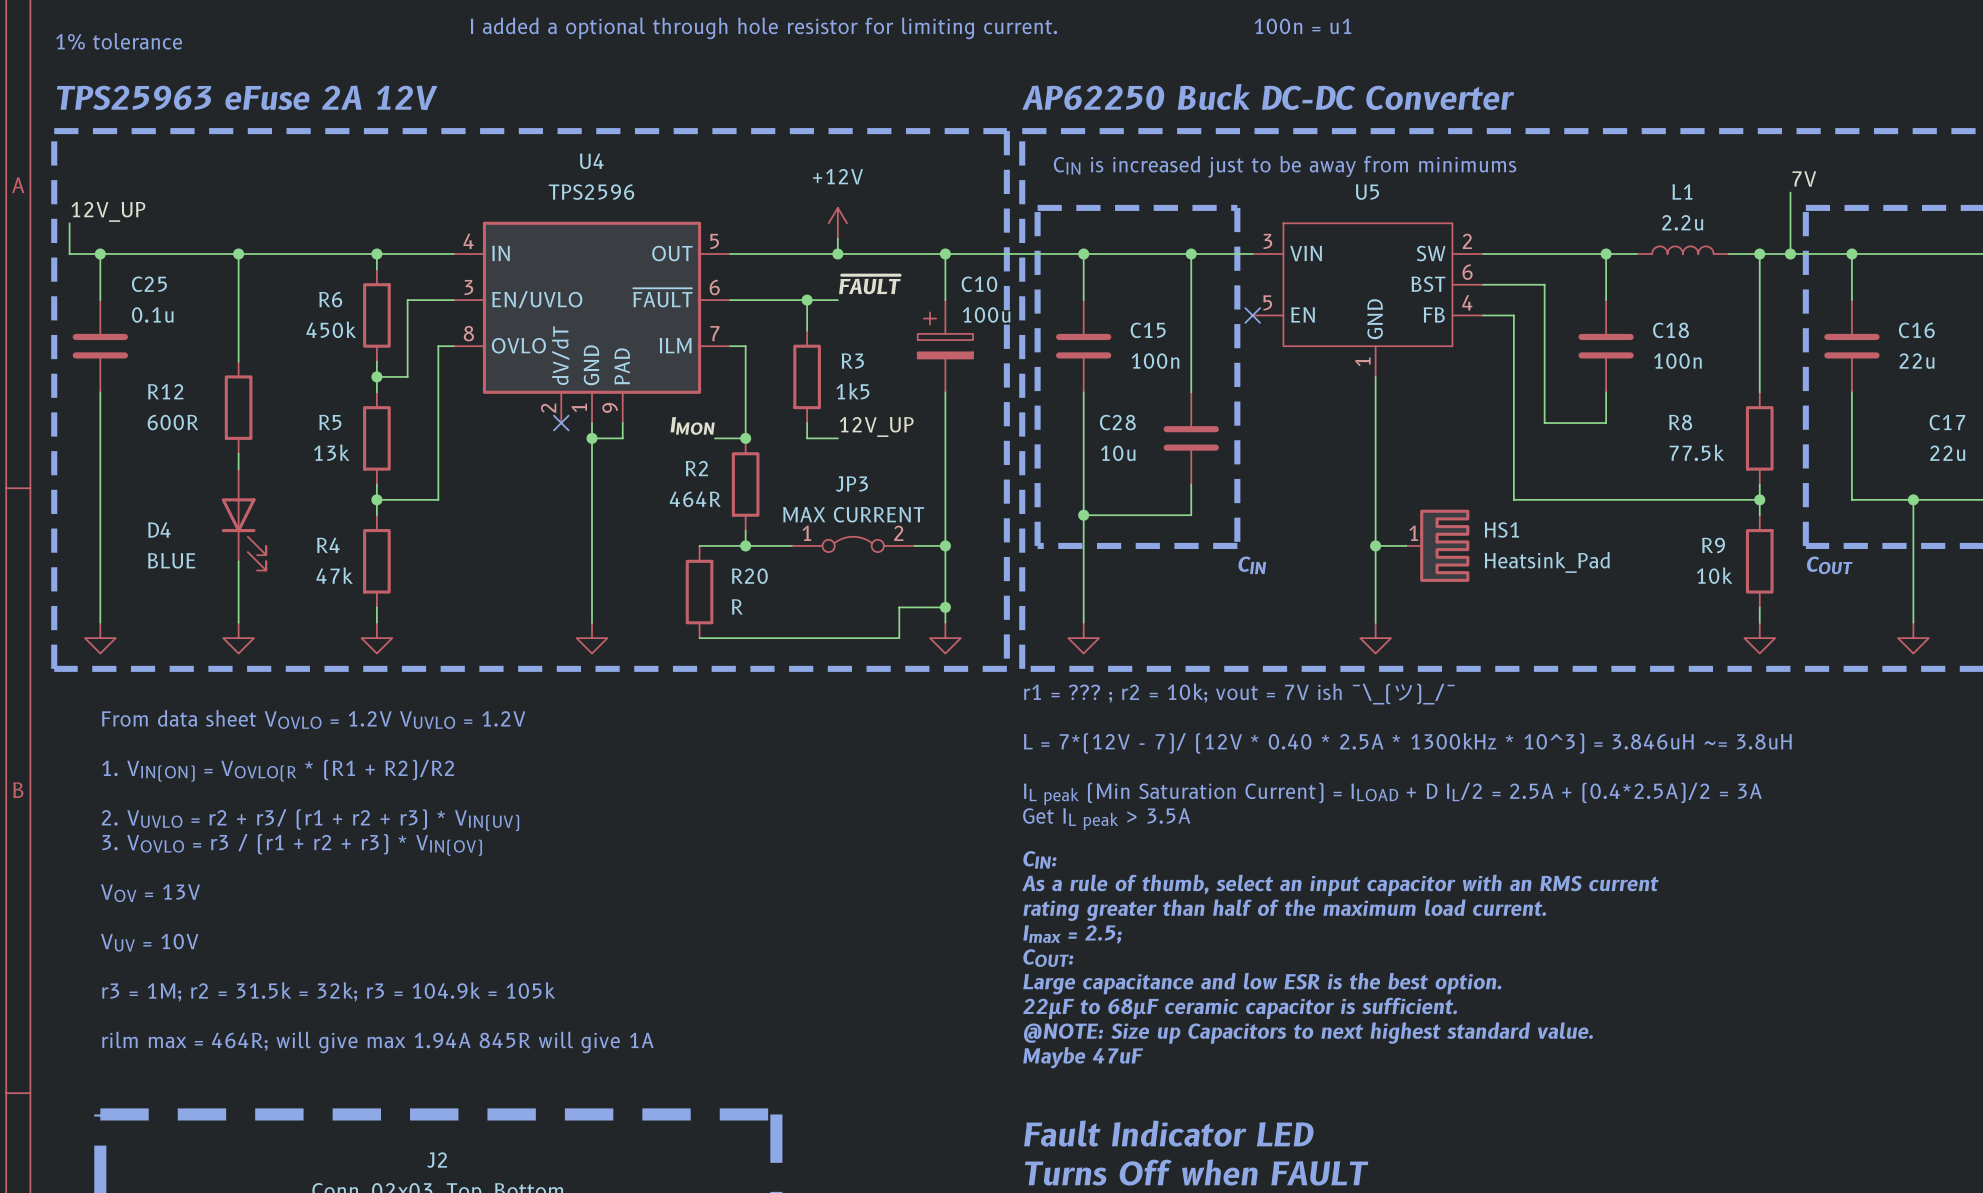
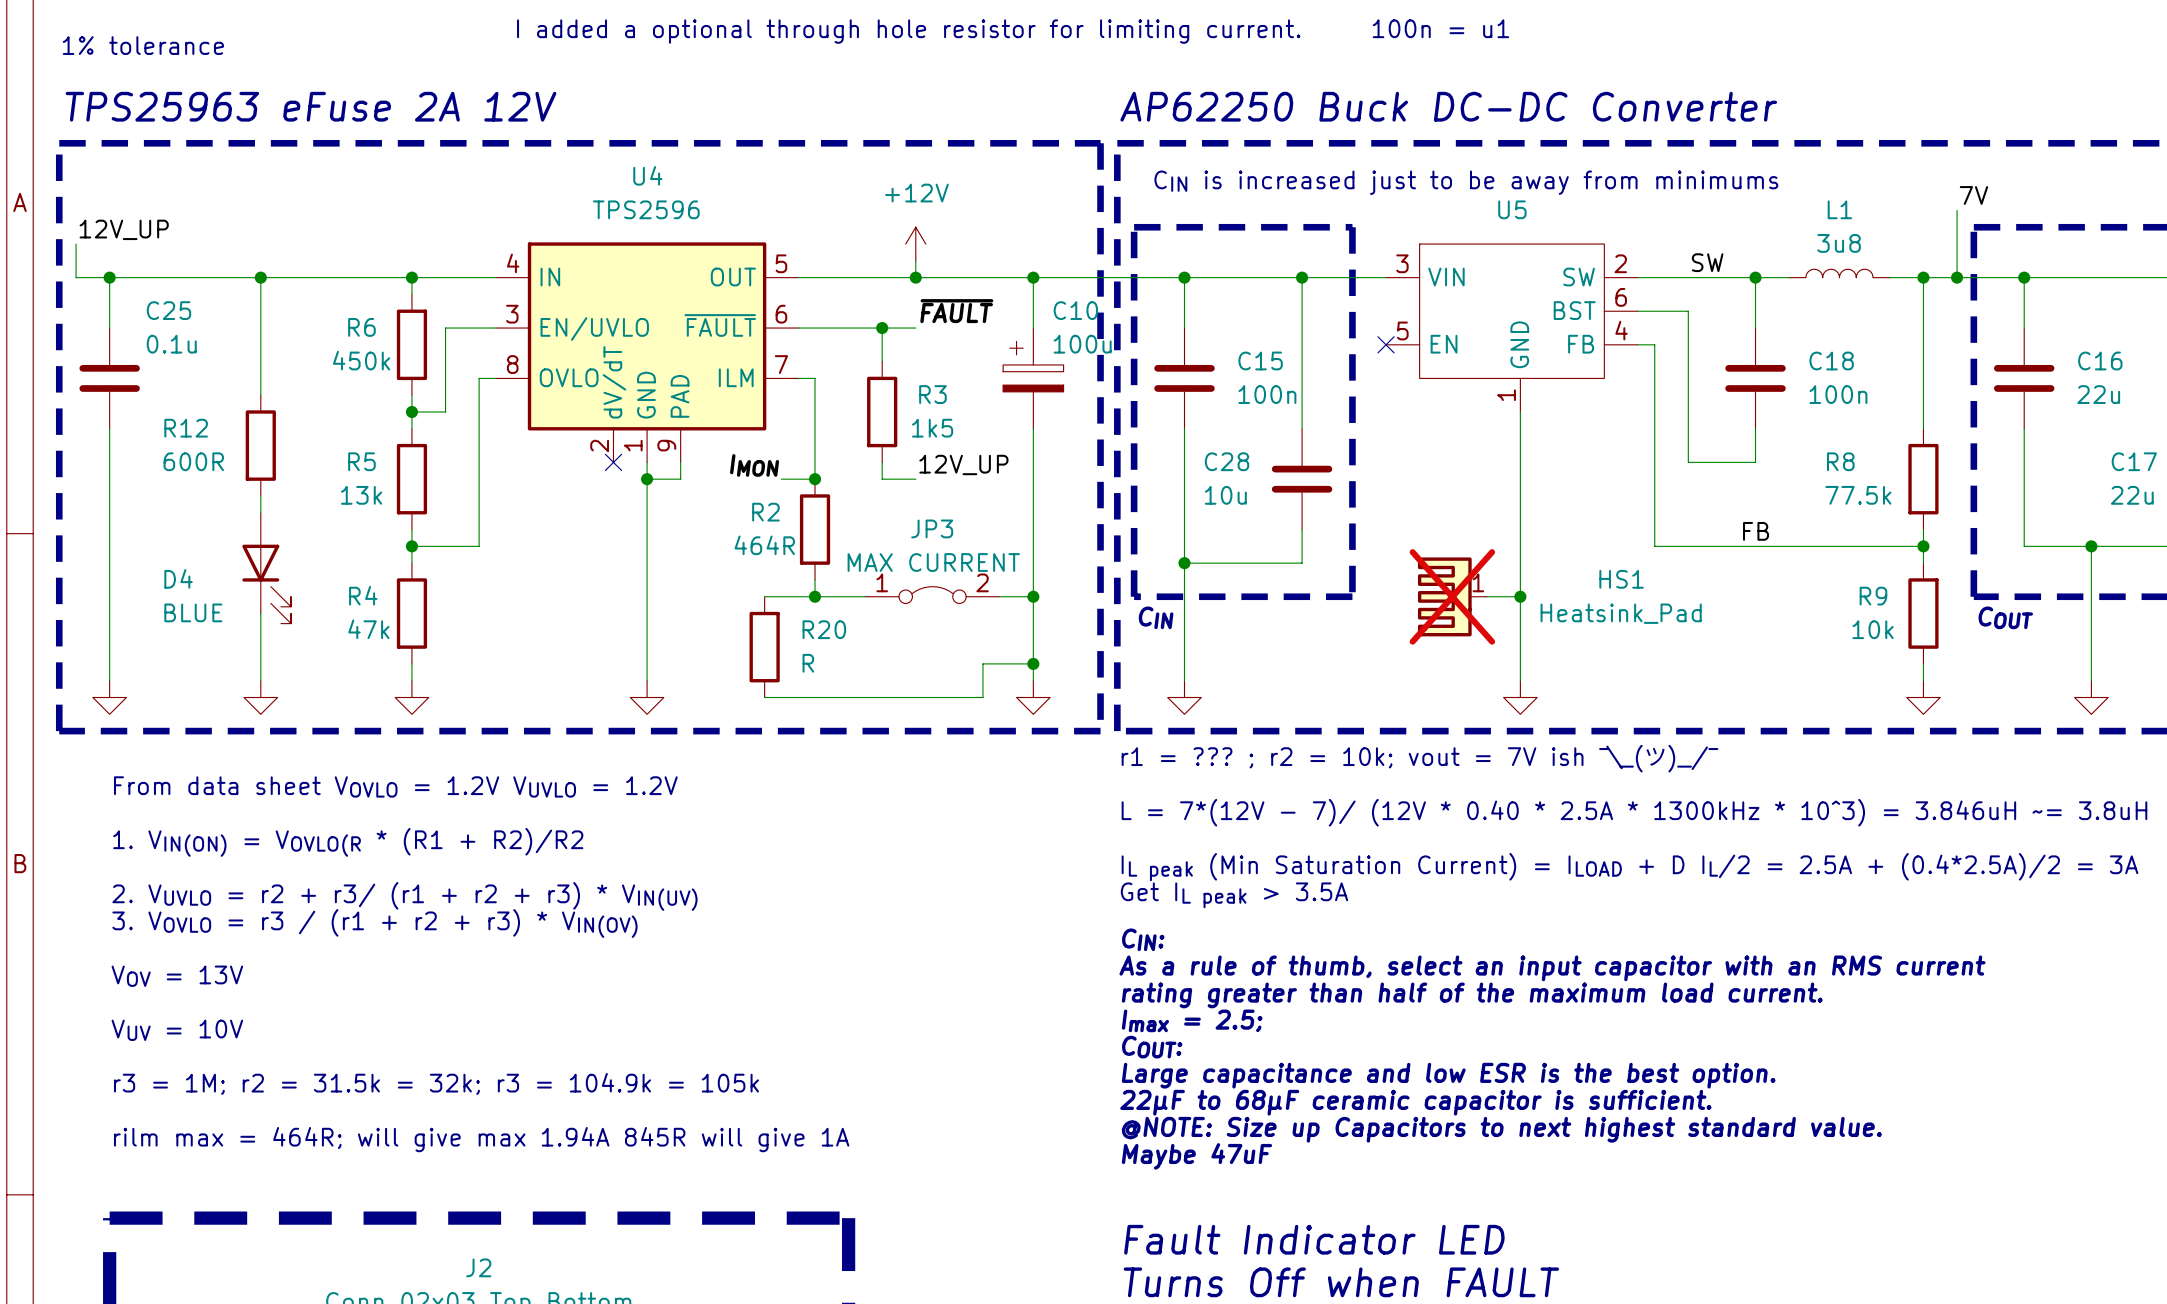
L1 value: 2.2u (1682, 222) -> 3u8 (1839, 243)
label: none -> SW (1707, 262)
U5 position: (1367, 300) -> (1511, 328)
no-connect mark position: (1252, 315) -> (1386, 344)
wire: (1375, 376) (1375, 622) -> (1520, 412) (1520, 680)
label: none -> FB (1756, 531)
HS1 name position: HS1 (1501, 529) -> HS1 (1621, 579)
junction position: (1375, 545) -> (1520, 596)
wire: (1390, 545) (1406, 545) -> (1486, 596) (1503, 596)
HS1 position: (1437, 545) -> (1452, 596)
HS1 rotation: 0° (1444, 545) -> 180° (1444, 596)
HS1 do-not-place cross: none -> (1452, 596)
text position: CIN (1252, 565) -> CIN (1156, 617)
power symbol position: (1375, 638) -> (1520, 697)

